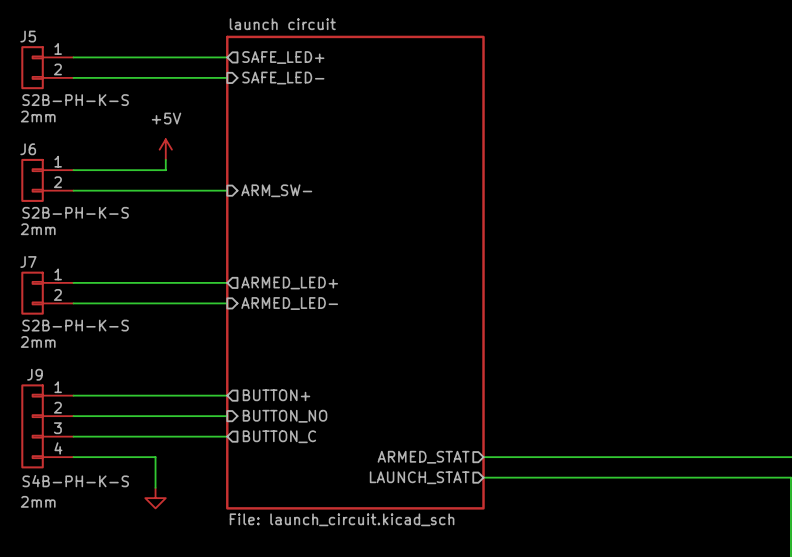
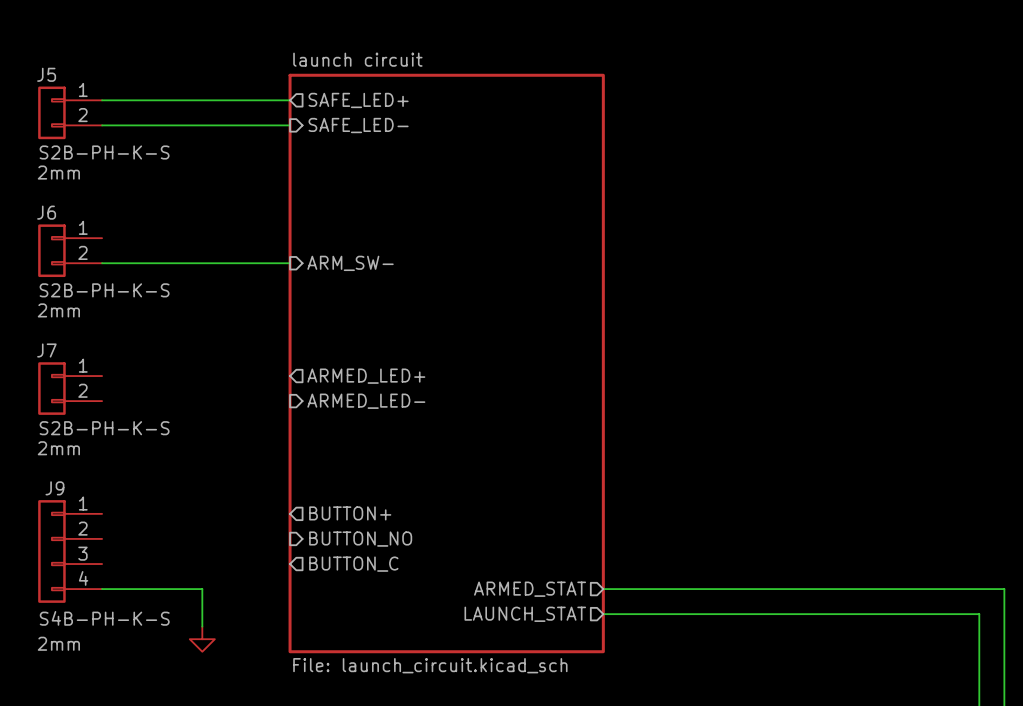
power symbol: +5V (165, 149) -> none
wire: (165, 159) (165, 170) (73, 170) -> none
wire: (73, 282) (227, 282) -> none
wire: (73, 303) (227, 303) -> none
wire: (73, 395) (227, 395) -> none
wire: (73, 416) (227, 416) -> none
wire: (73, 436) (227, 436) -> none

